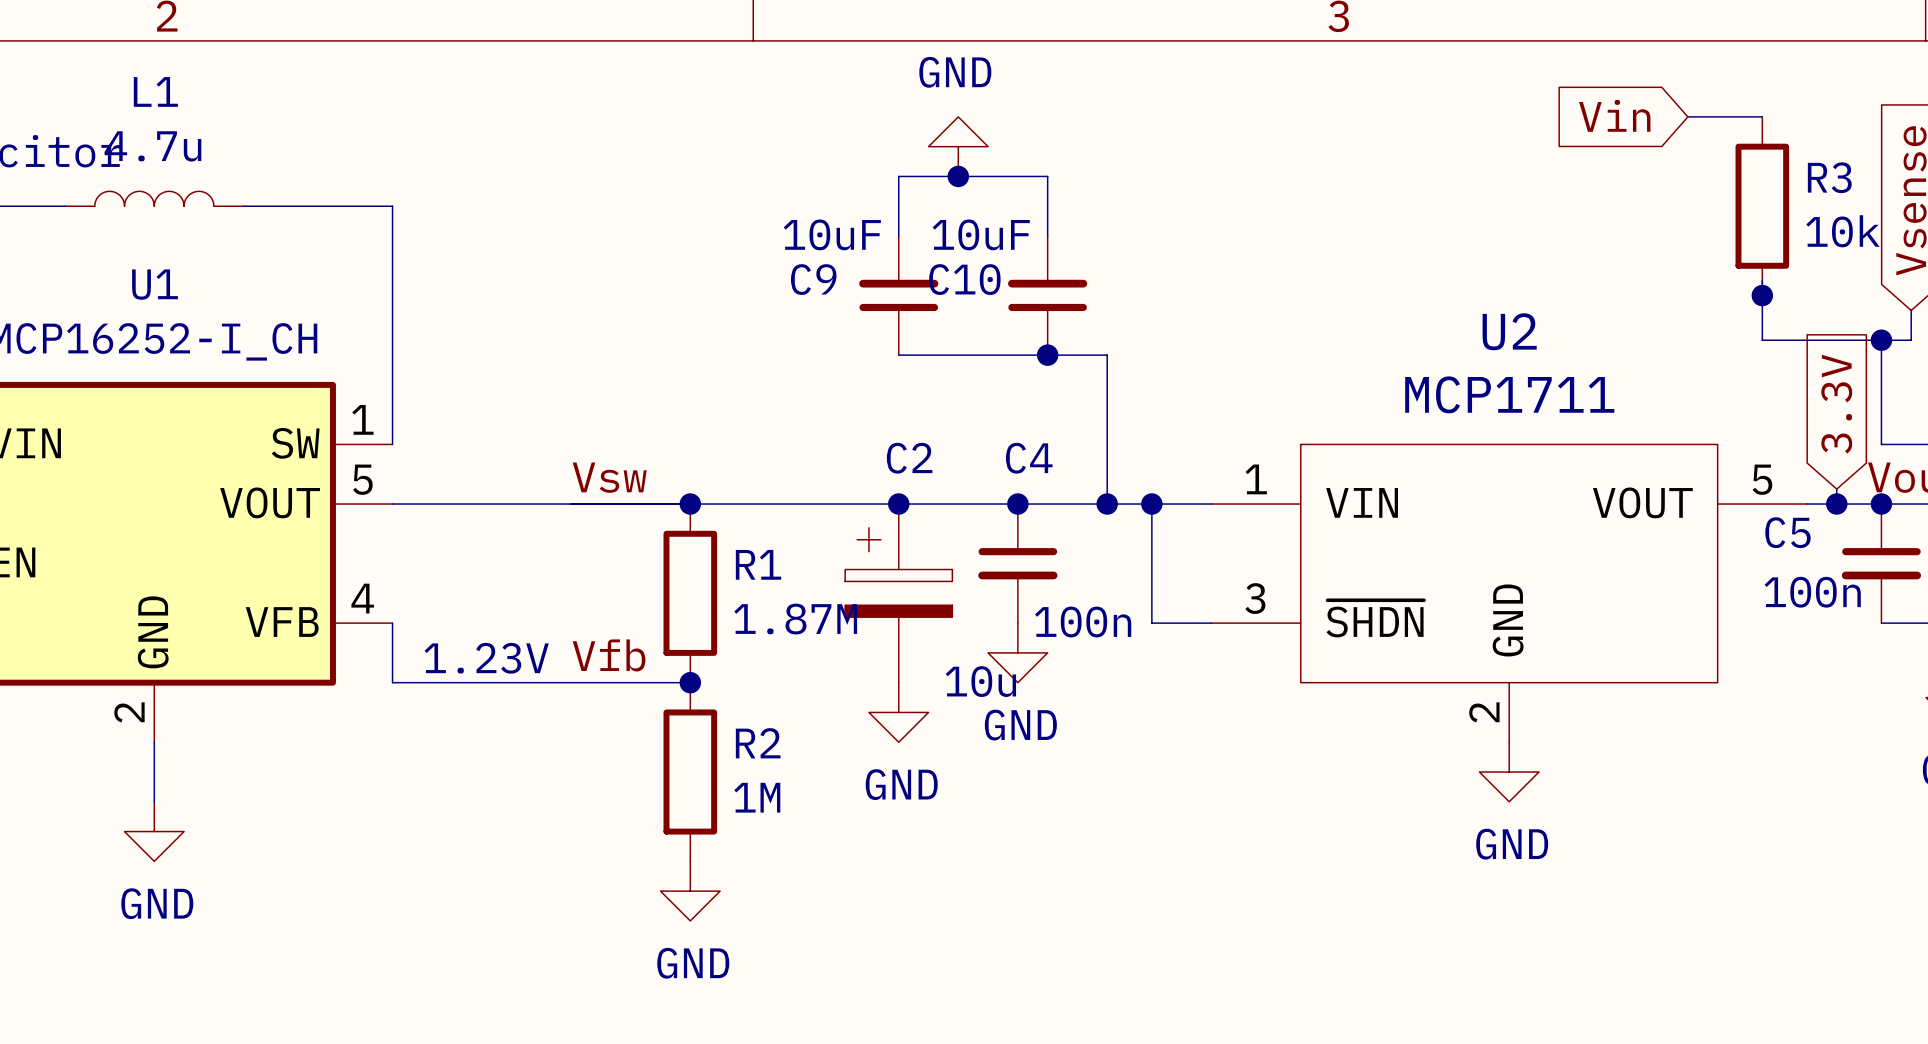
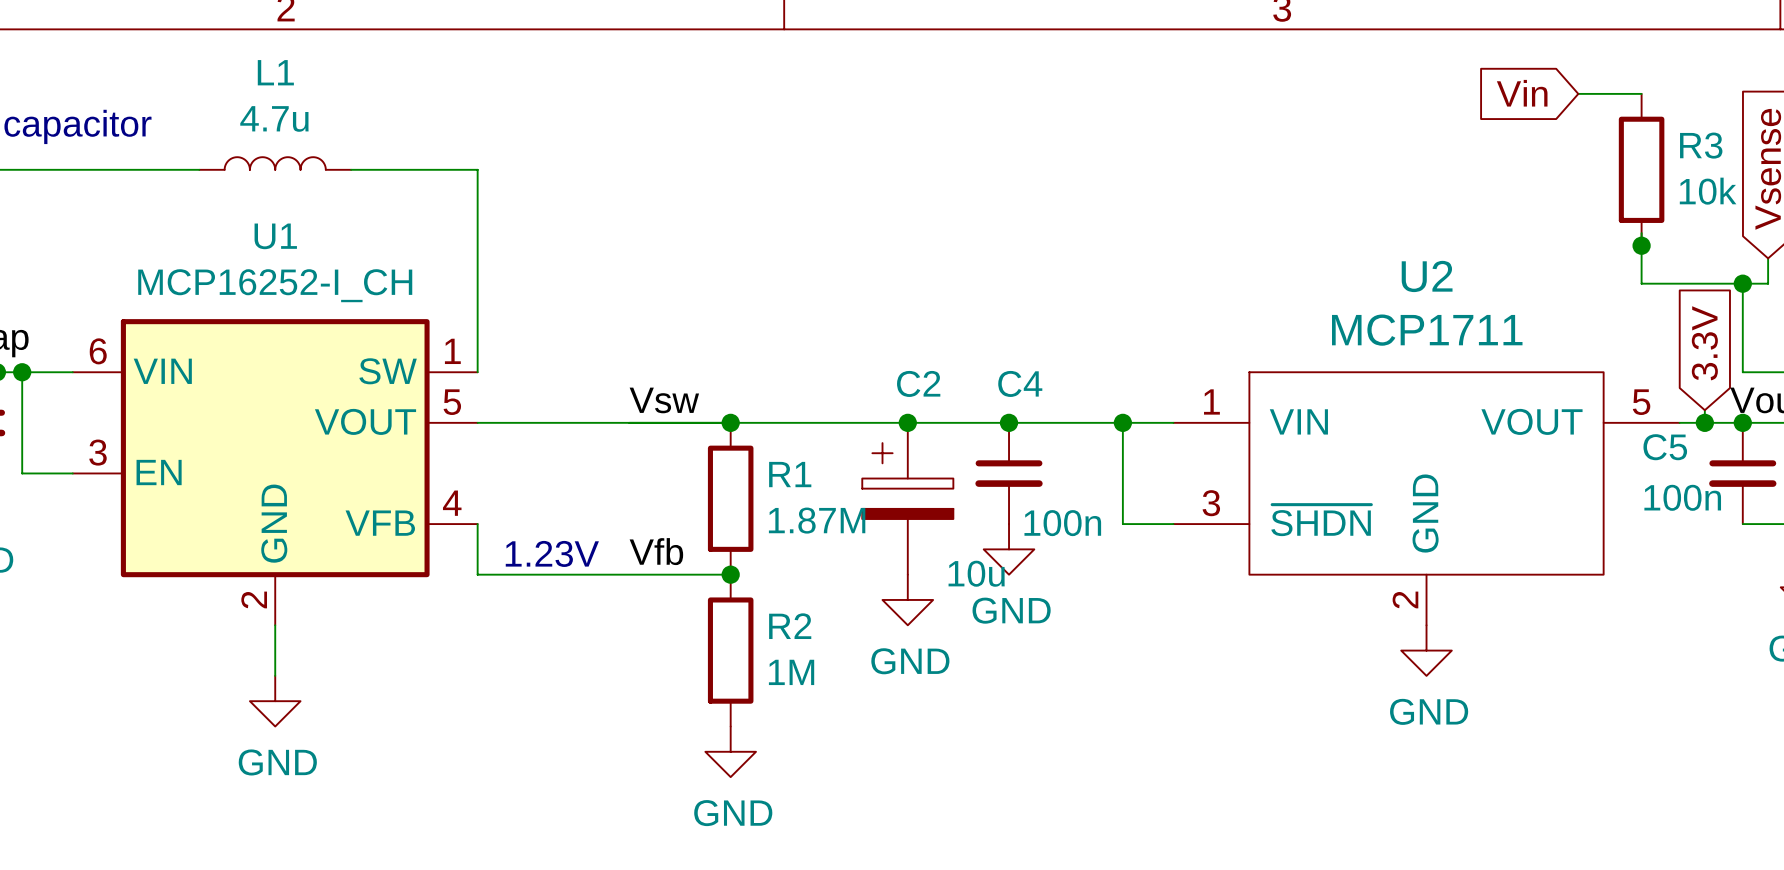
power symbol: GND (958, 146) -> none
junction: (958, 176) -> none
wire: (898, 236) (898, 176) (1047, 176) (1047, 236) -> none
C9: 10uF (898, 295) -> none
C10: 10uF (1047, 295) -> none
wire: (898, 355) (1107, 355) (1107, 504) -> none
junction: (1047, 355) -> none
junction: (1107, 504) -> none

